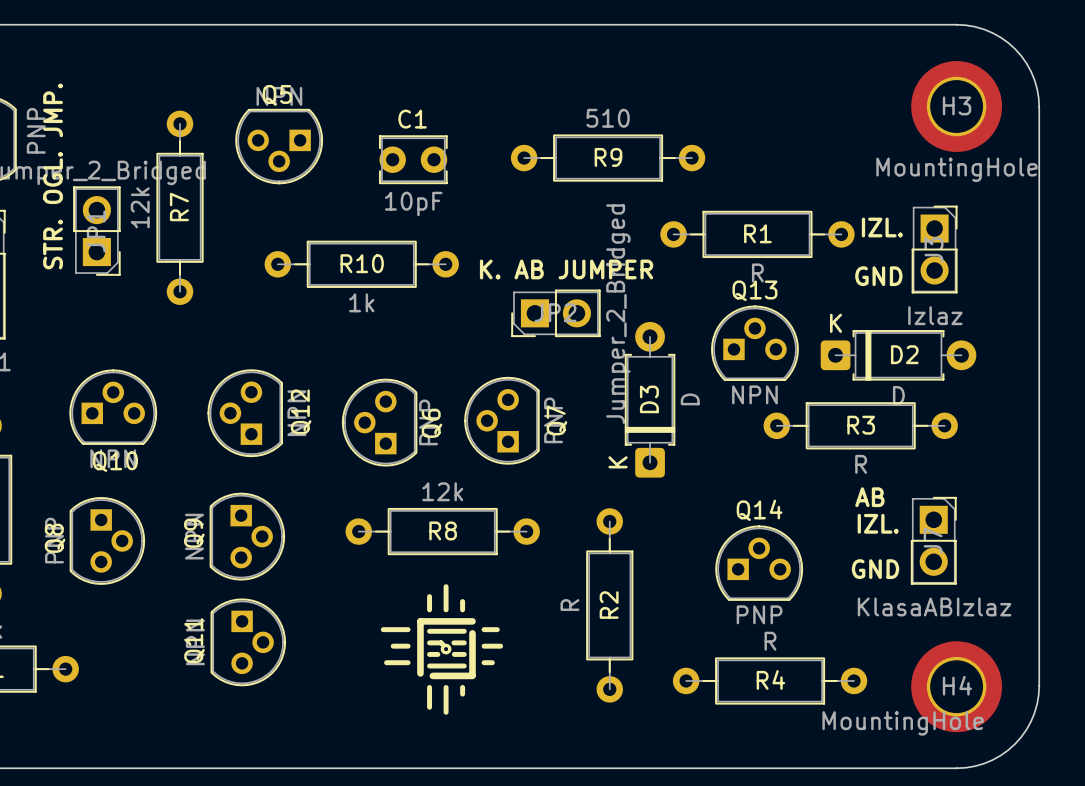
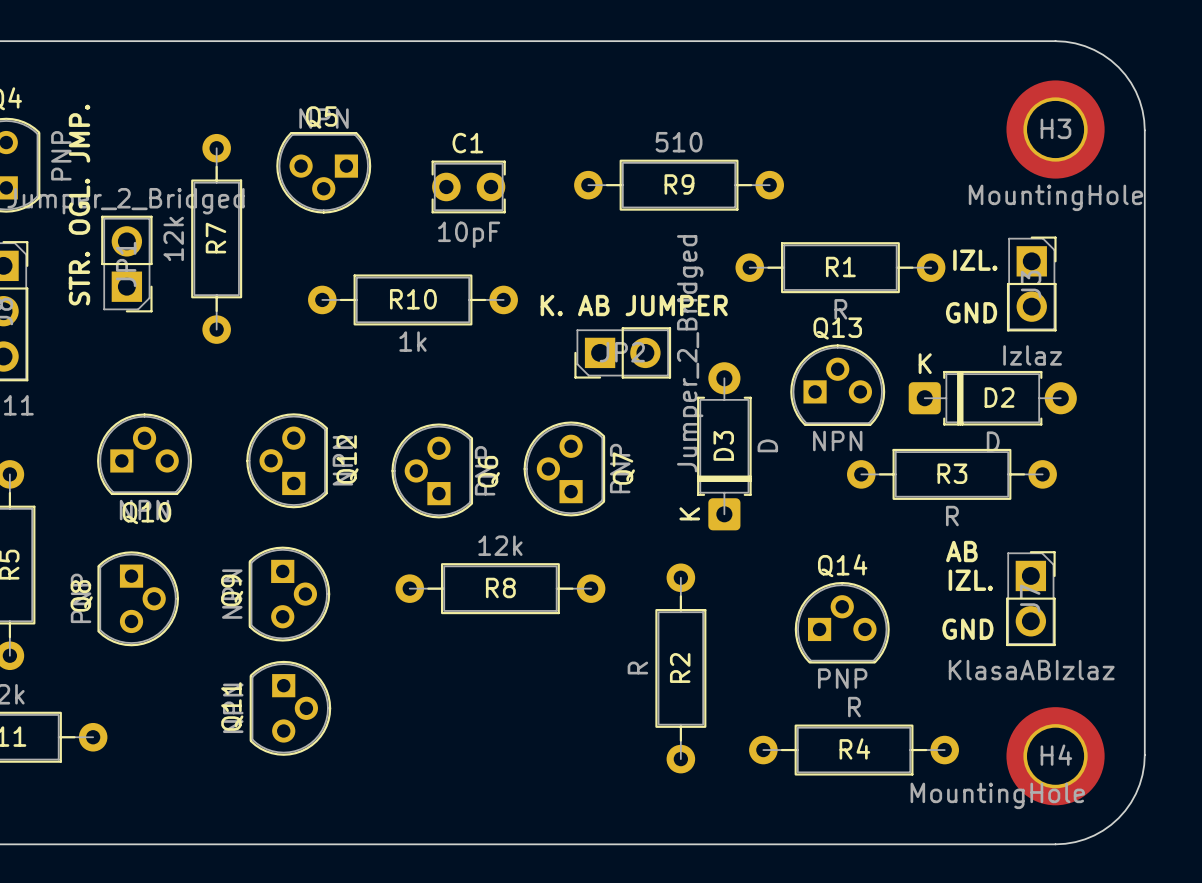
drawing: [380, 584, 504, 715] -> none

